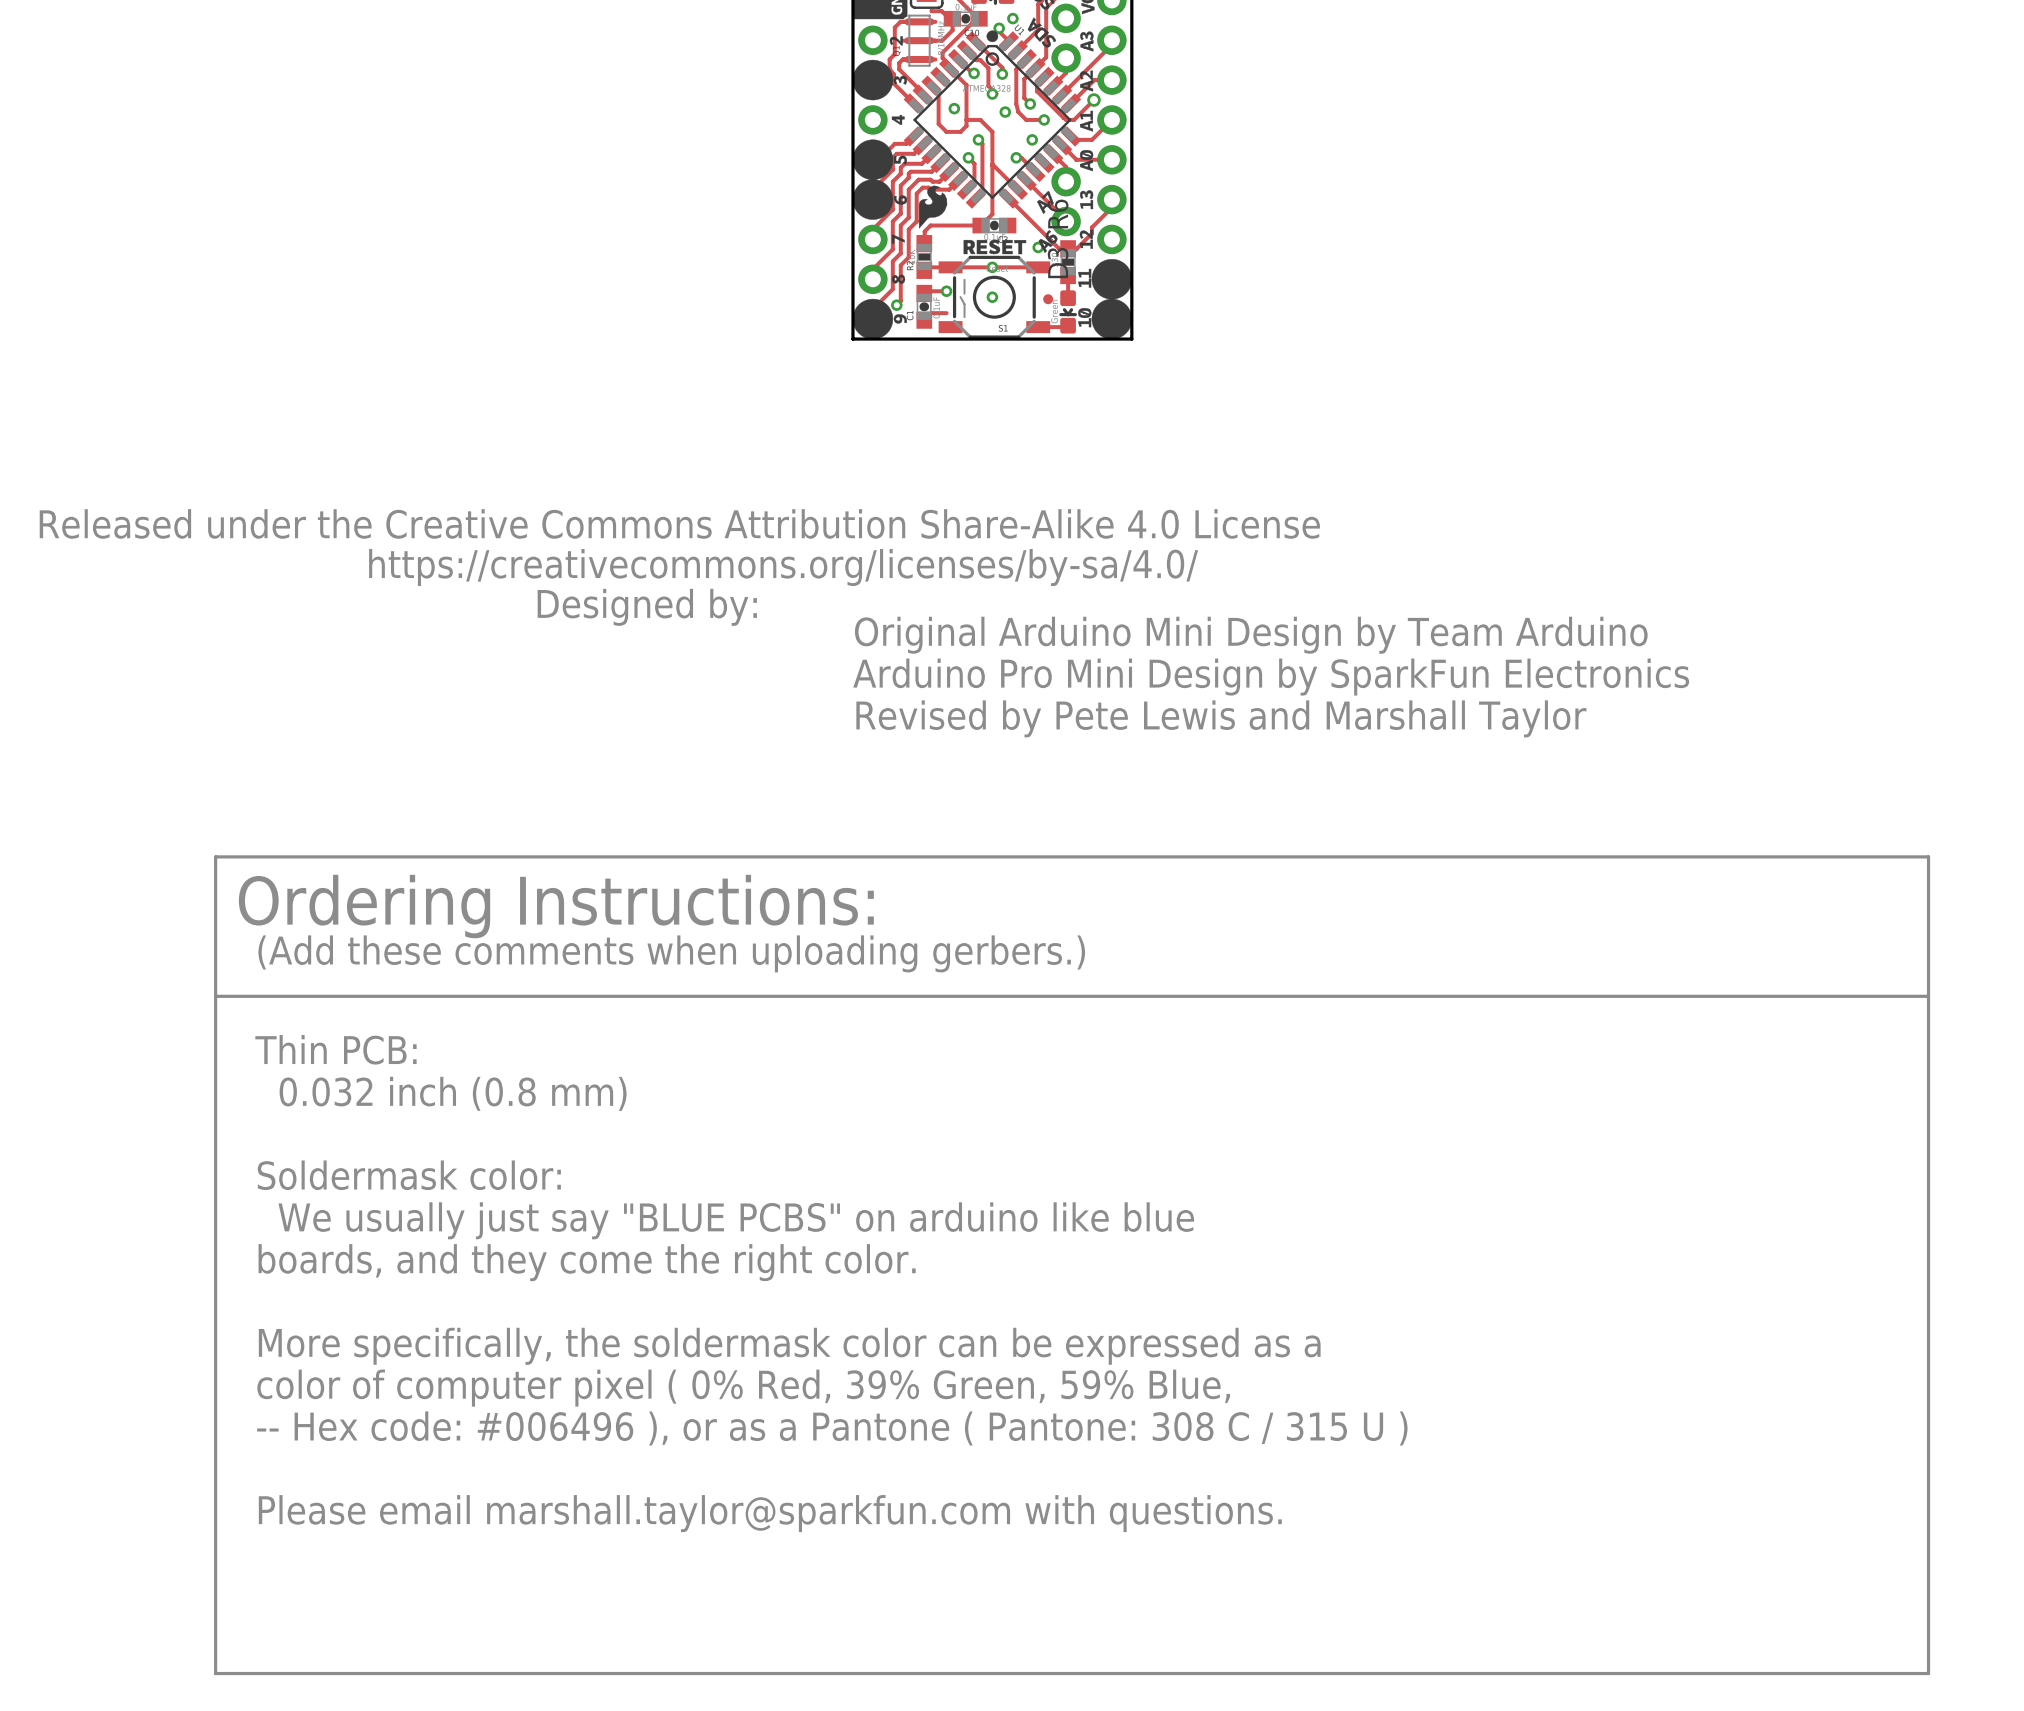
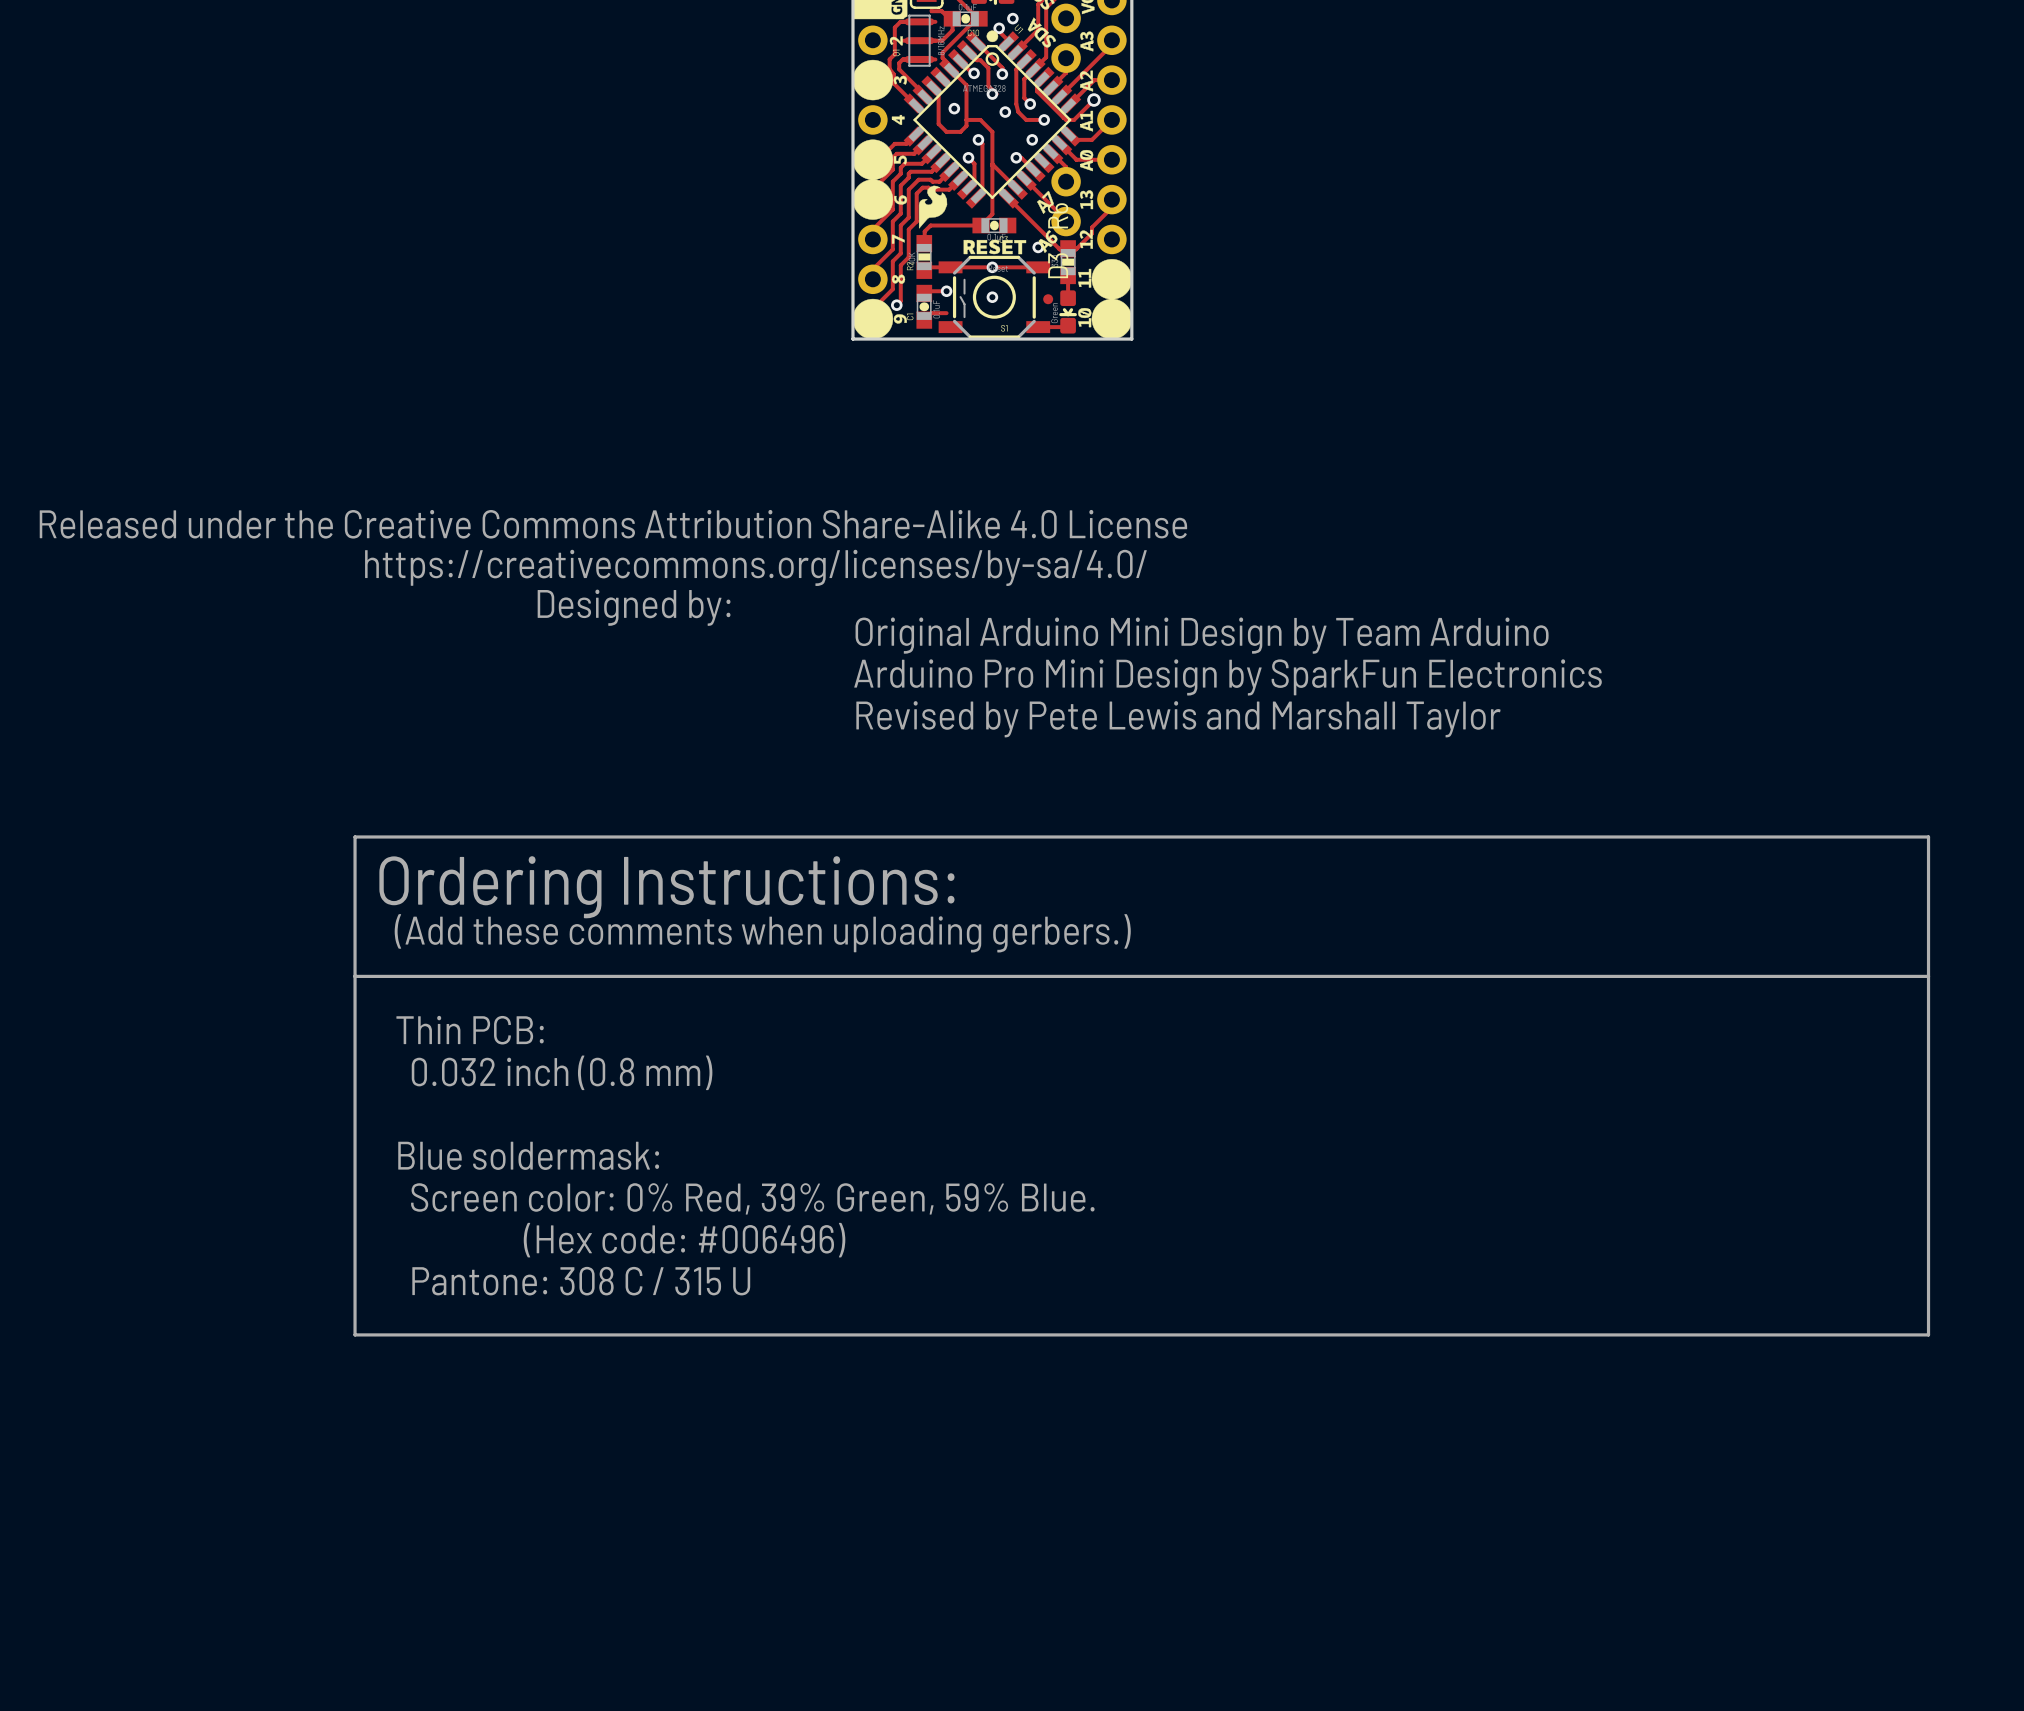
line: (1928, 856) (215, 856) (215, 1673) (1928, 1673) (1928, 1334) -> (1928, 856) (1928, 836) (355, 836) (355, 1334) (1928, 1334)
text position: Ordering Instructions: (556, 906) -> Ordering Instructions: (666, 887)
text position: (Add these comments when uploading gerbers.) (671, 953) -> (Add these comments when uploading gerbers.) (762, 933)
line: none -> (355, 976) (1928, 976)
line: (215, 996) (1928, 996) -> none
text position: Thin PCB: (335, 1049) -> Thin PCB: (470, 1030)
text position: 0.032 inch (0.8 mm) (453, 1093) -> 0.032 inch (0.8 mm) (562, 1072)
text: Soldermask color: (409, 1175) -> Blue soldermask: (528, 1155)
text: none -> Screen color: 0% Red, 39% Green, 59% Blue. (752, 1198)
text: We usually just say "BLUE PCBS" on arduino like blue (736, 1220) -> none
text: none -> (Hex code: #006496) (684, 1240)
text: boards, and they come the right color. (587, 1262) -> none
text: none -> Pantone: 308 C / 315 U (581, 1281)
text: More specifically, the soldermask color can be expressed as a (789, 1346) -> none
text: color of computer pixel ( 0% Red, 39% Green, 59% Blue, (743, 1388) -> none
text: -- Hex code: #006496 ), or as a Pantone ( Pantone: 308 C / 315 U ) (832, 1428) -> none
text: Please email marshall.taylor@sparkfun.com with questions. (770, 1513) -> none

